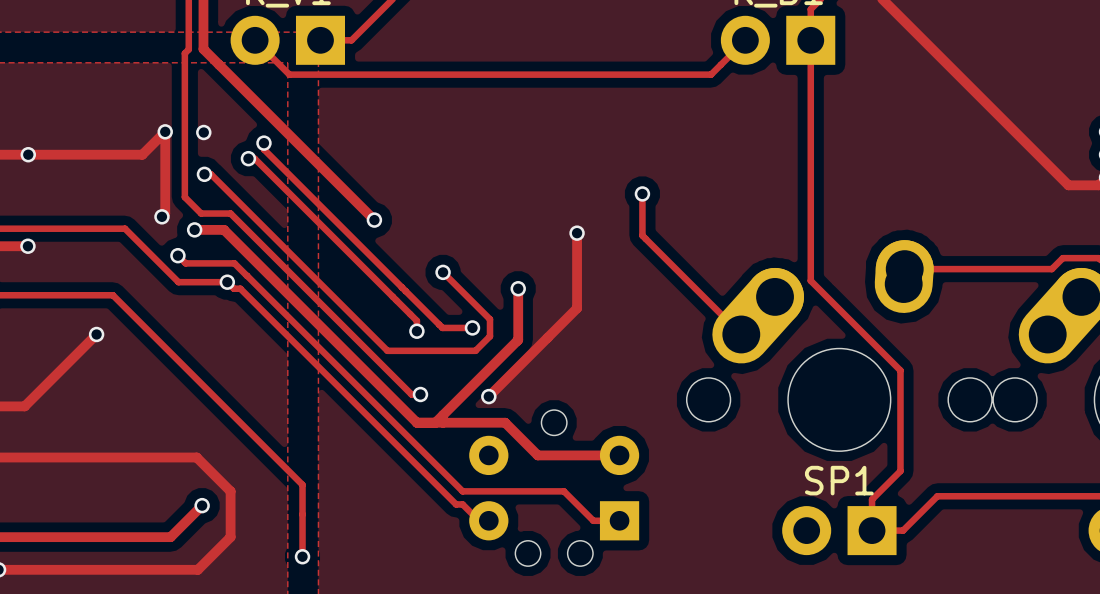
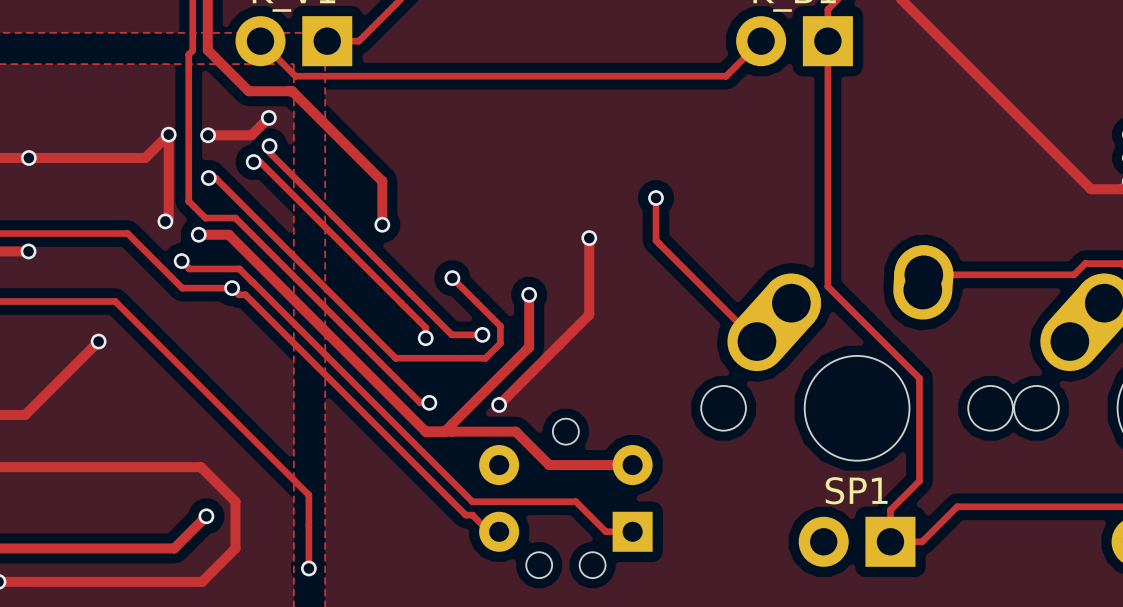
track: (243, 89) (374, 220) -> (289, 91) (292, 91) (382, 181) (382, 224)
track: none -> (248, 91) (289, 91)
track: none -> (268, 117) (251, 135) (208, 135)
via: none -> (268, 117)

